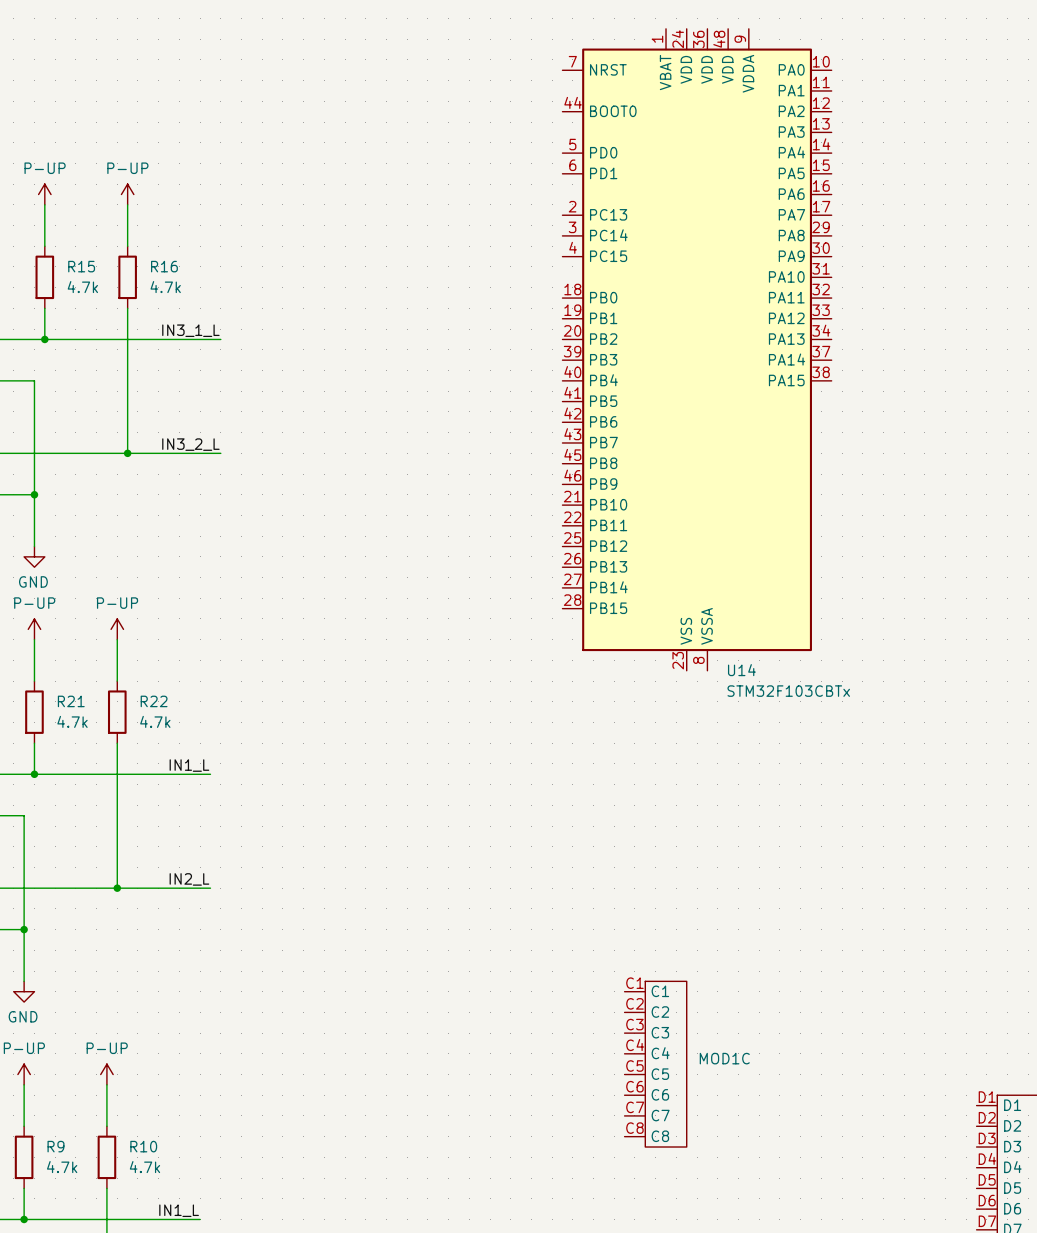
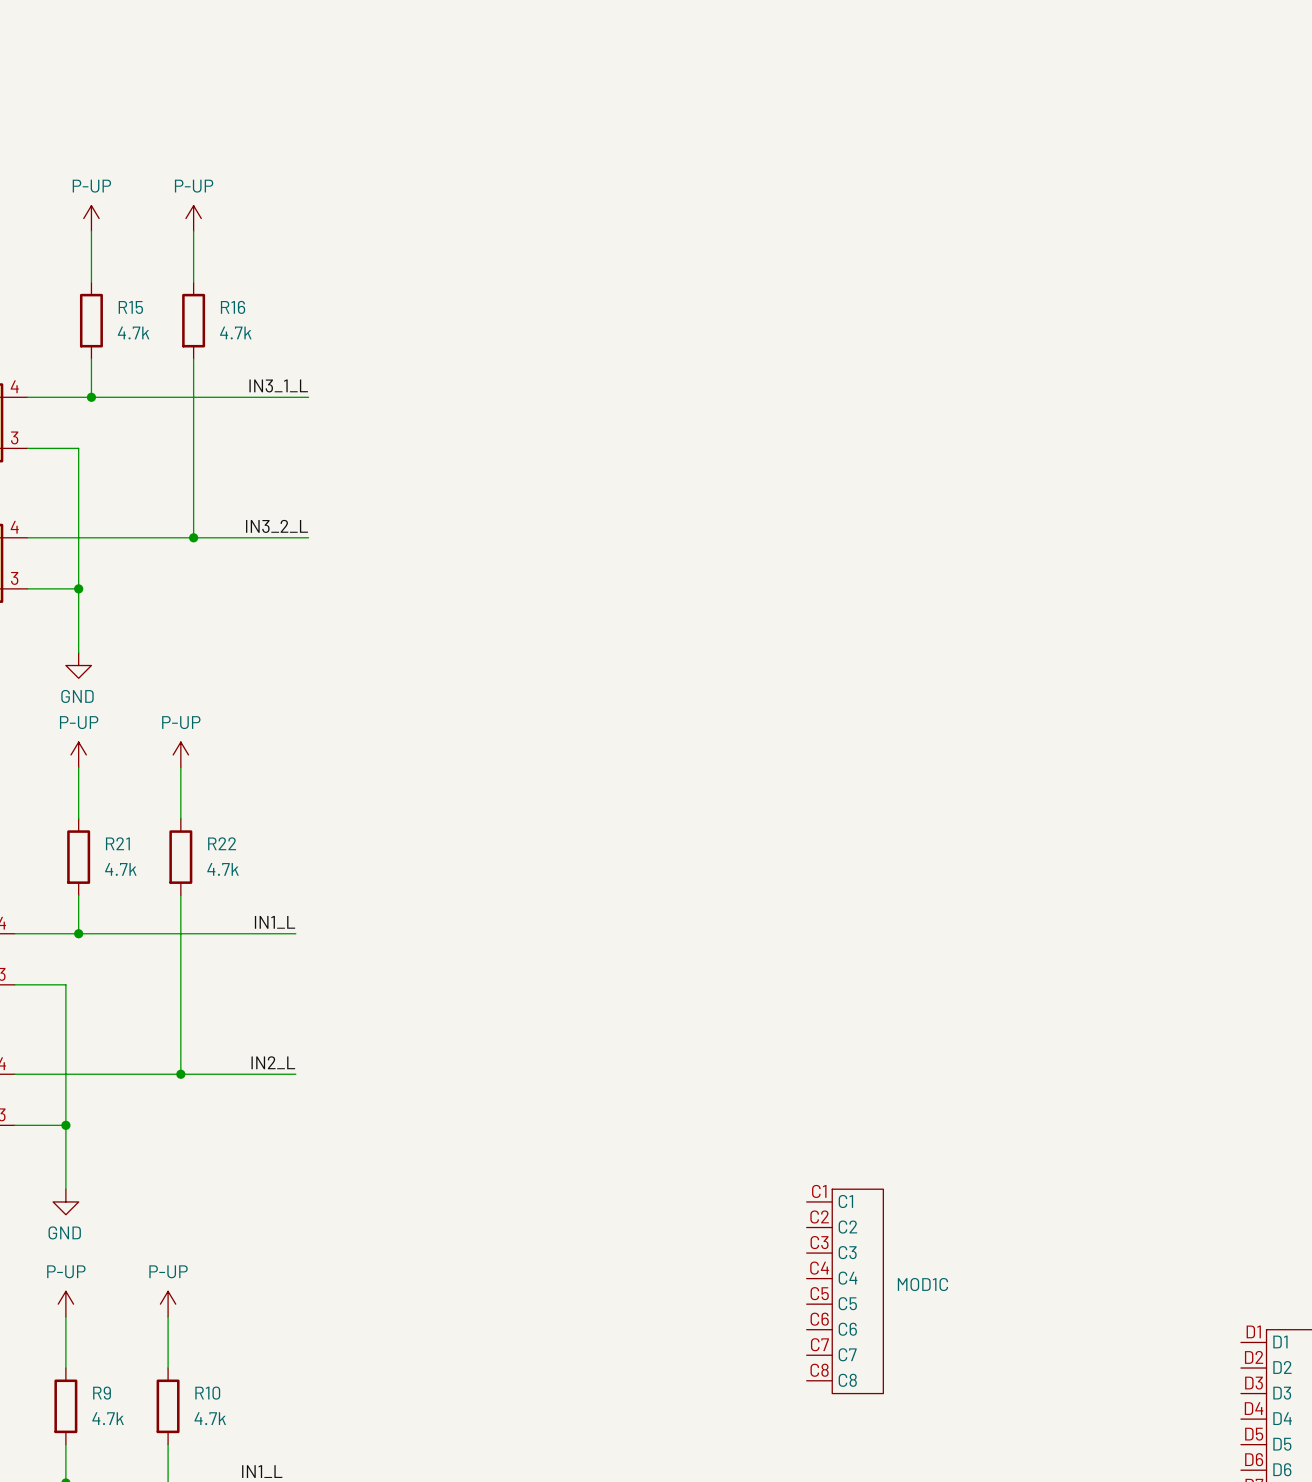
U14: STM32F103CBTx (697, 349) -> none

